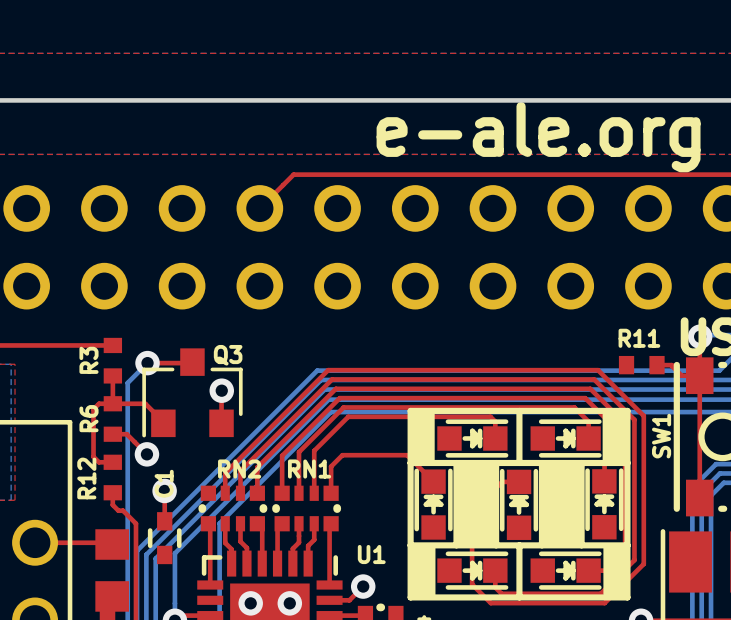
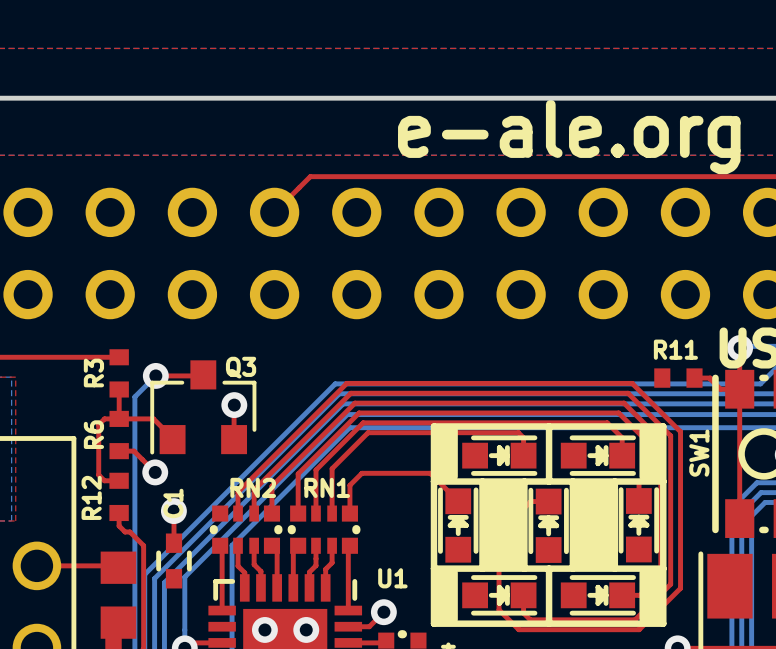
drawing shape: [602, 409, 629, 464] -> [639, 425, 664, 481]
drawing shape: [409, 410, 435, 465] -> [434, 425, 458, 481]
drawing shape: [409, 543, 436, 599] -> [434, 568, 458, 624]
drawing shape: [603, 544, 630, 599] -> [639, 568, 664, 624]

